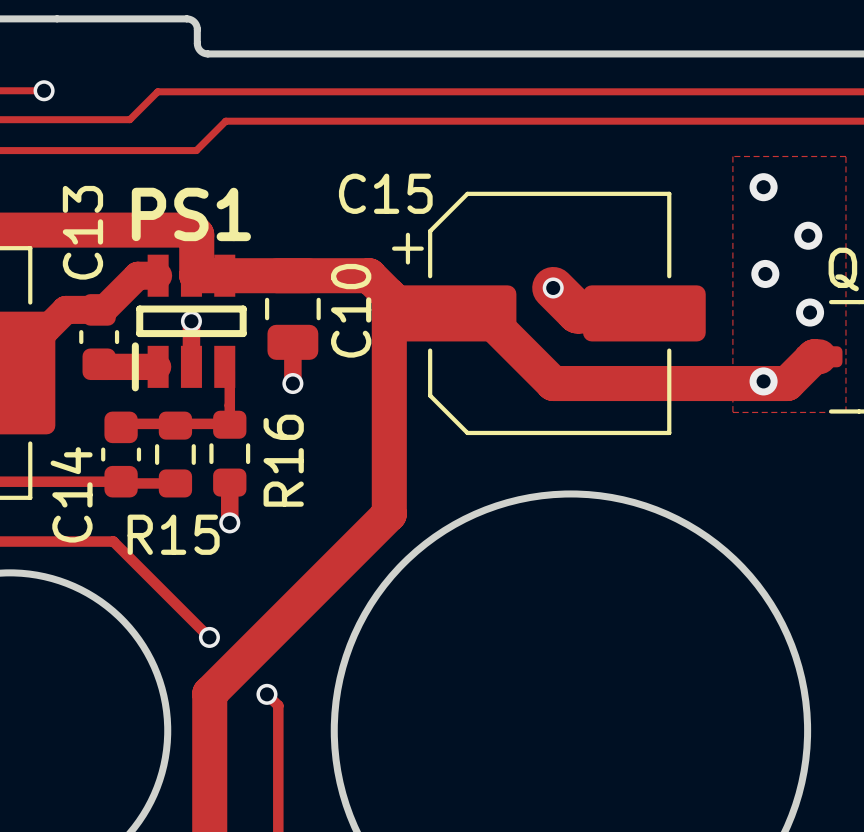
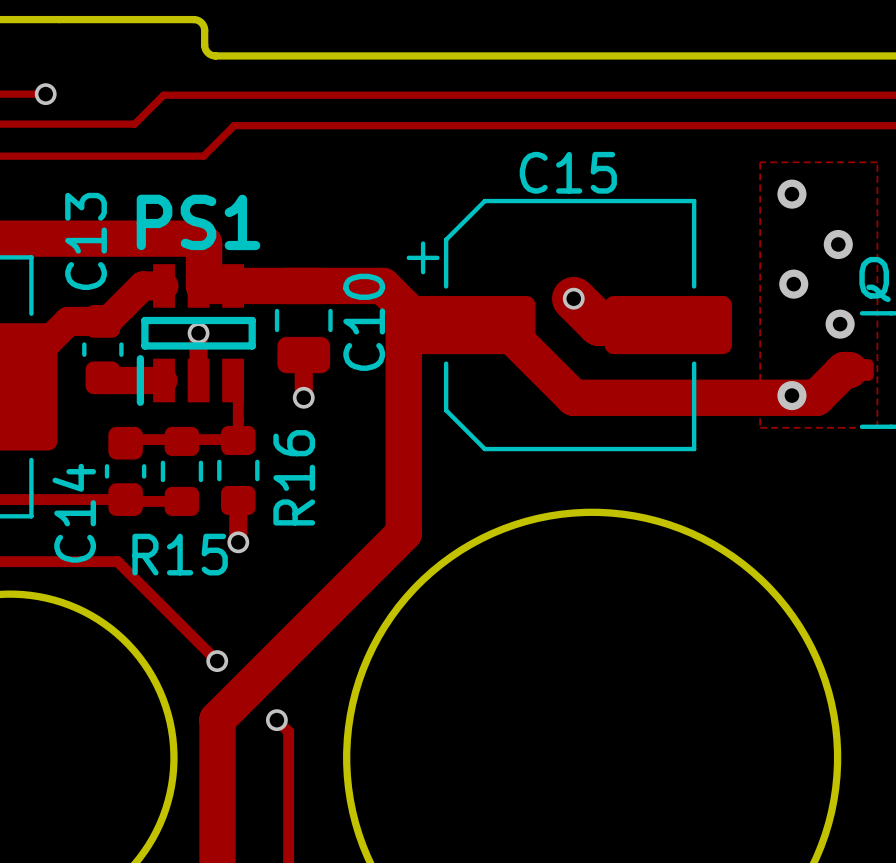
C15 name position: C15 (385, 193) -> C15 (568, 172)

